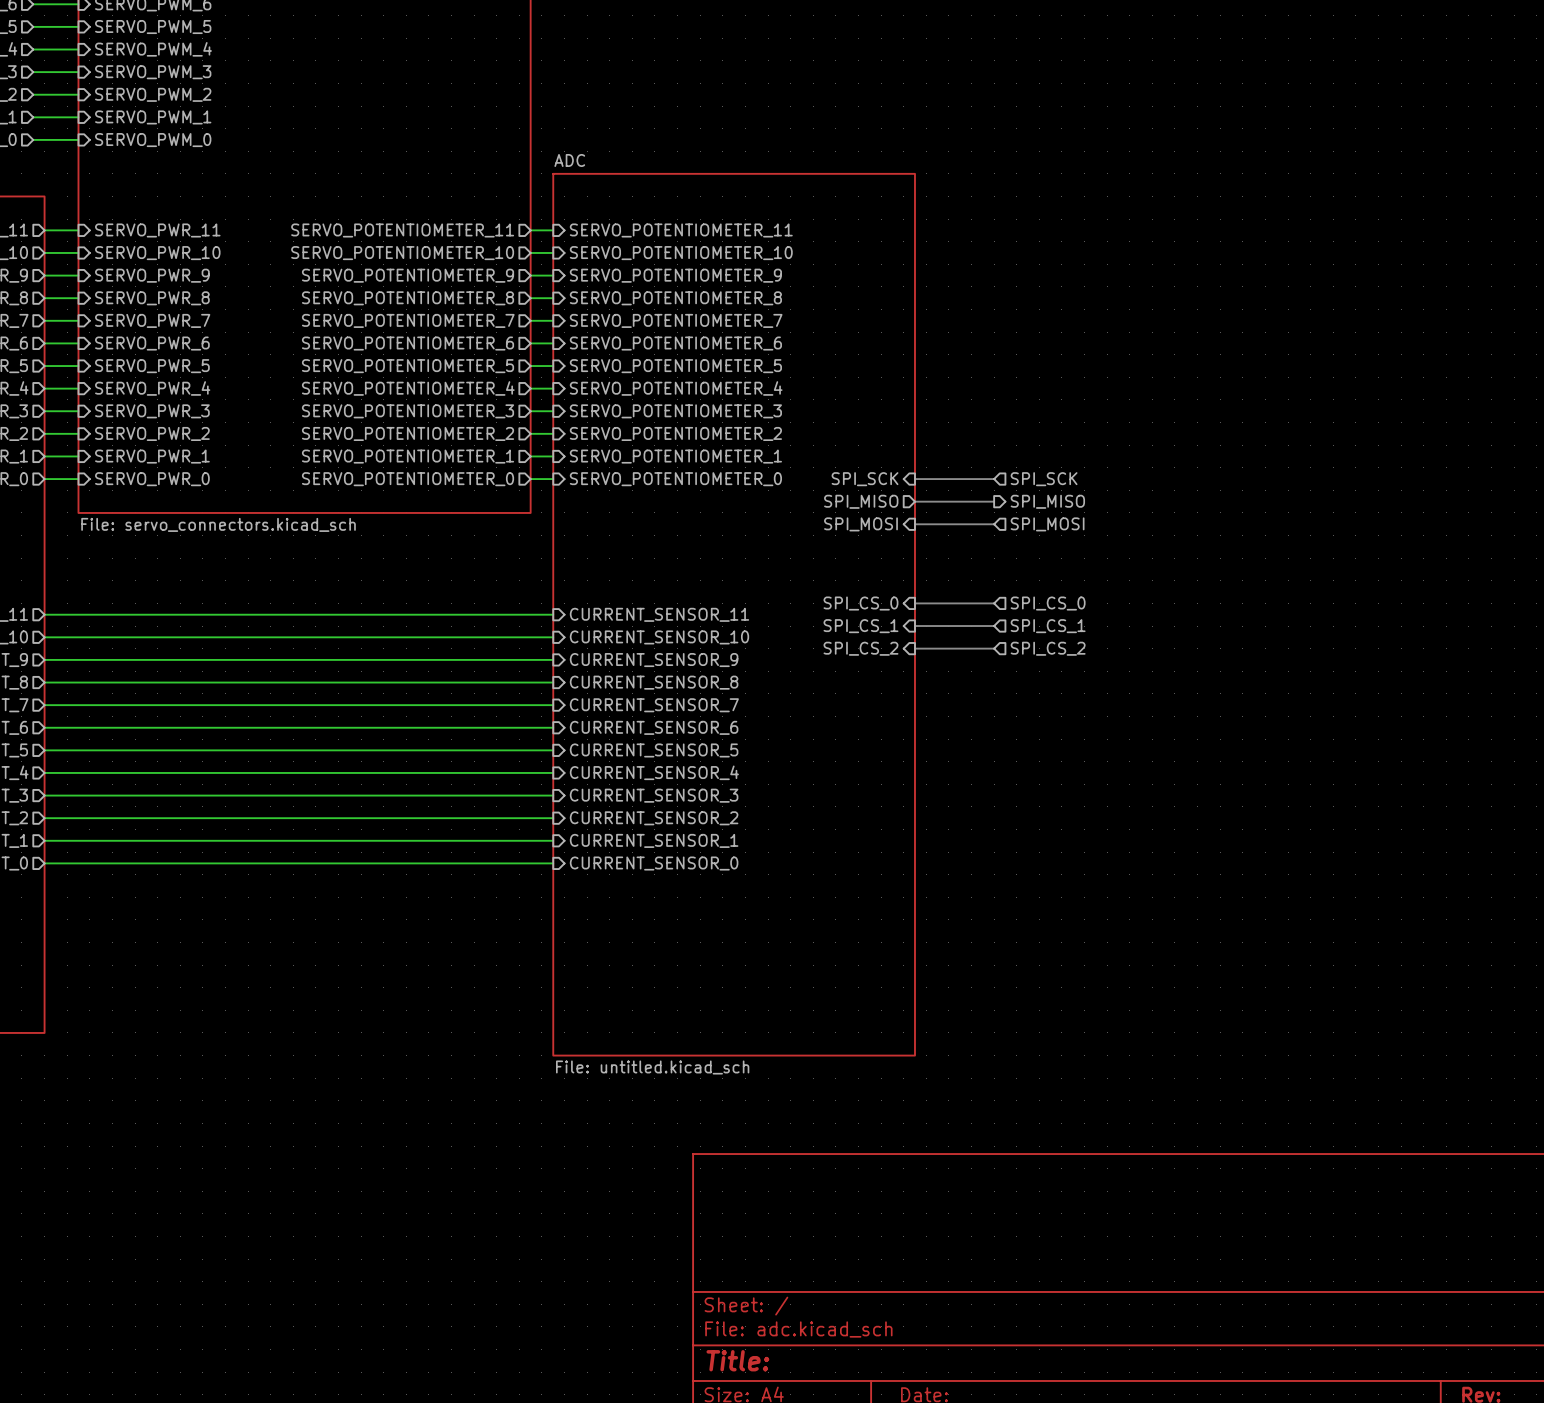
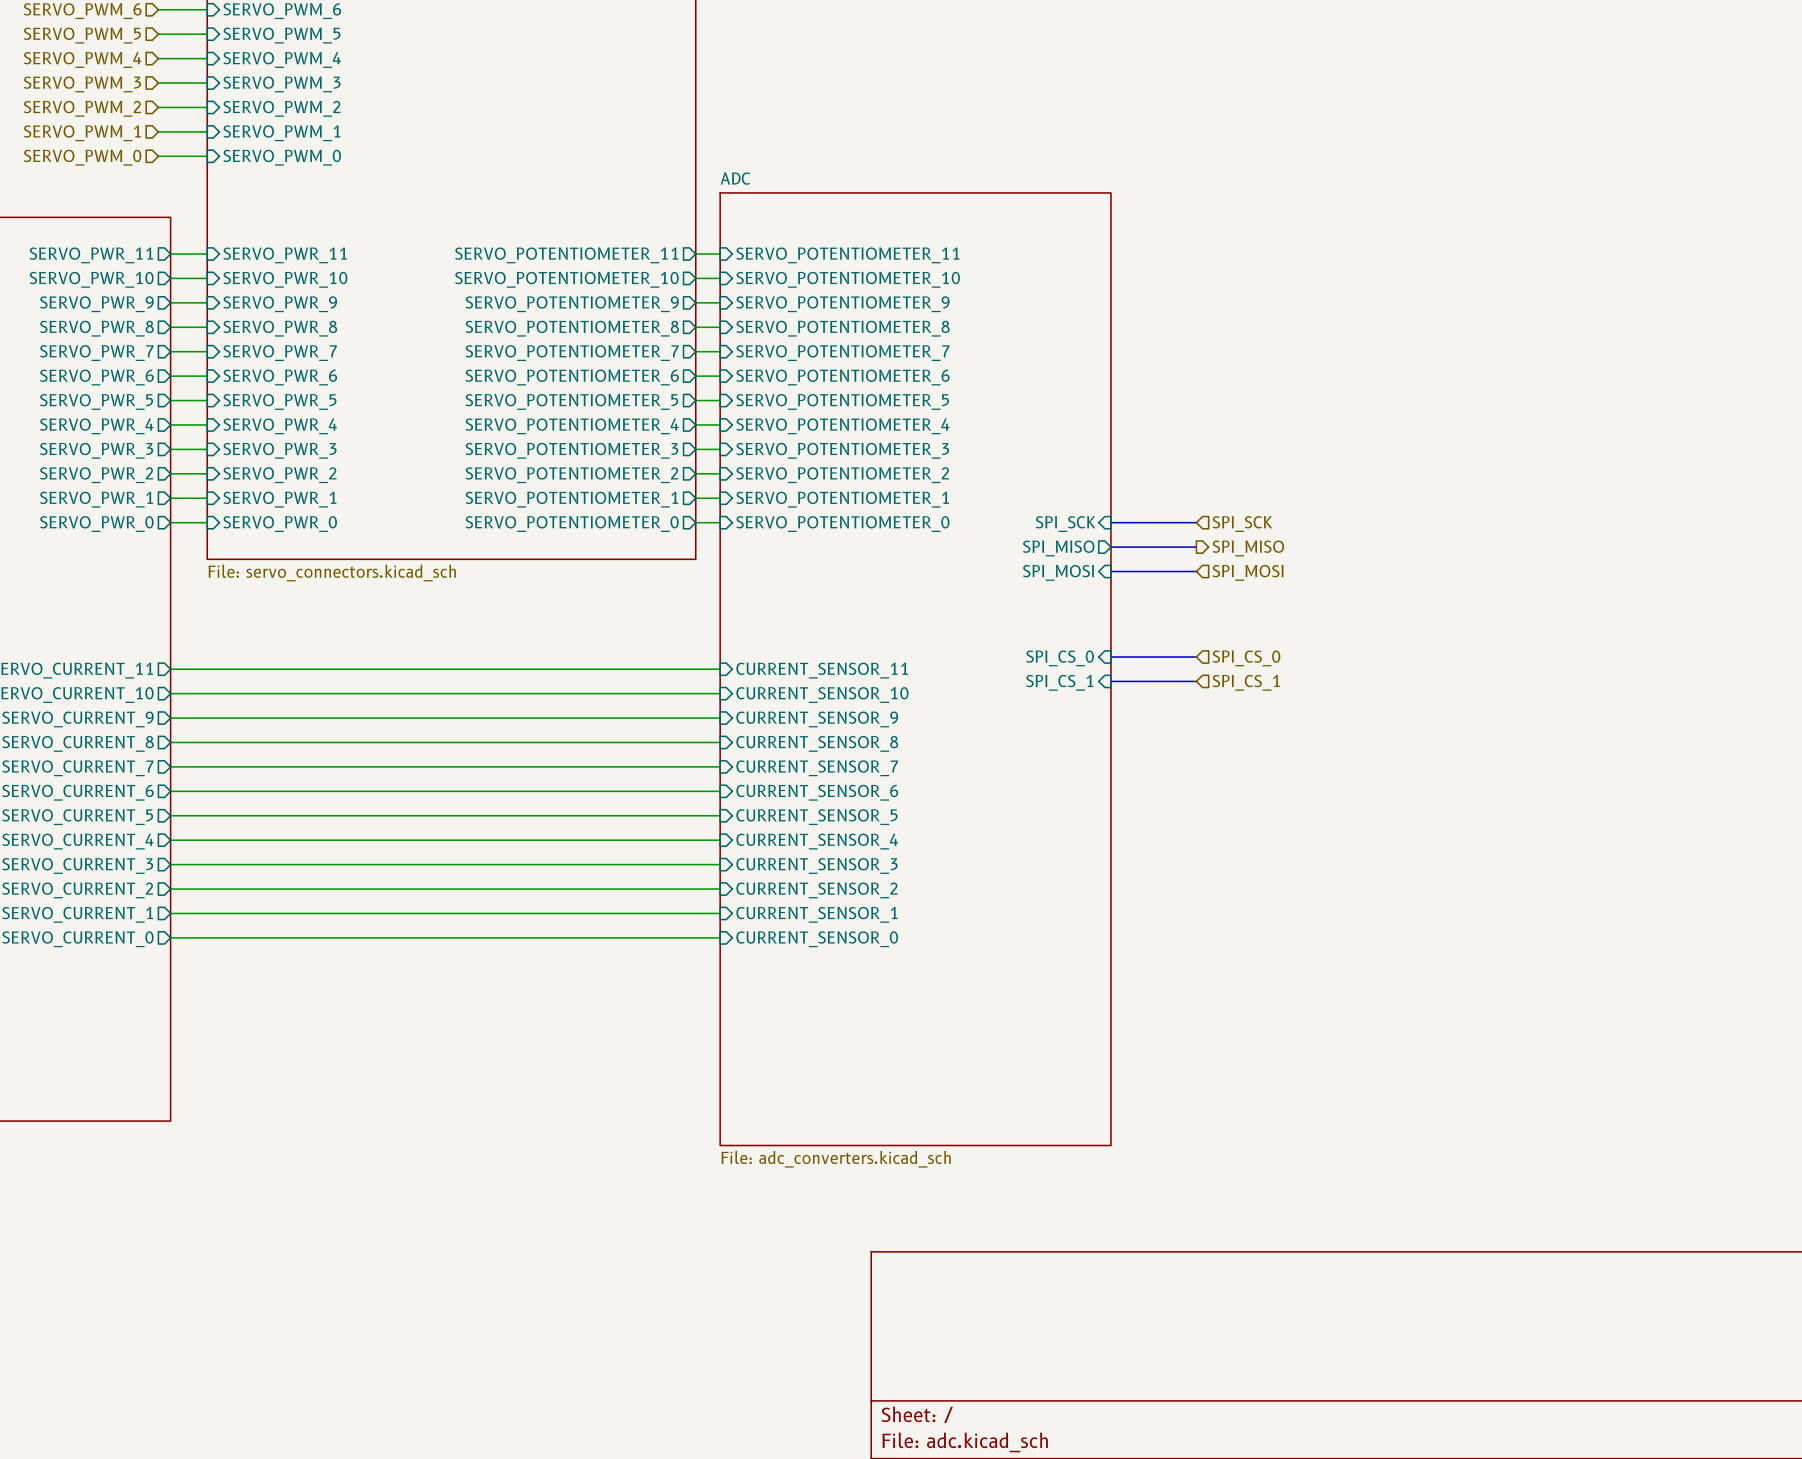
sheet pin: SPI_CS_2 (860, 648) -> none
bus: (914, 648) (994, 648) -> none
hierarchical label: SPI_CS_2 (1048, 648) -> none
sheet ADC value: File: untitled.kicad_sch (652, 1067) -> File: adc_converters.kicad_sch (836, 1159)

